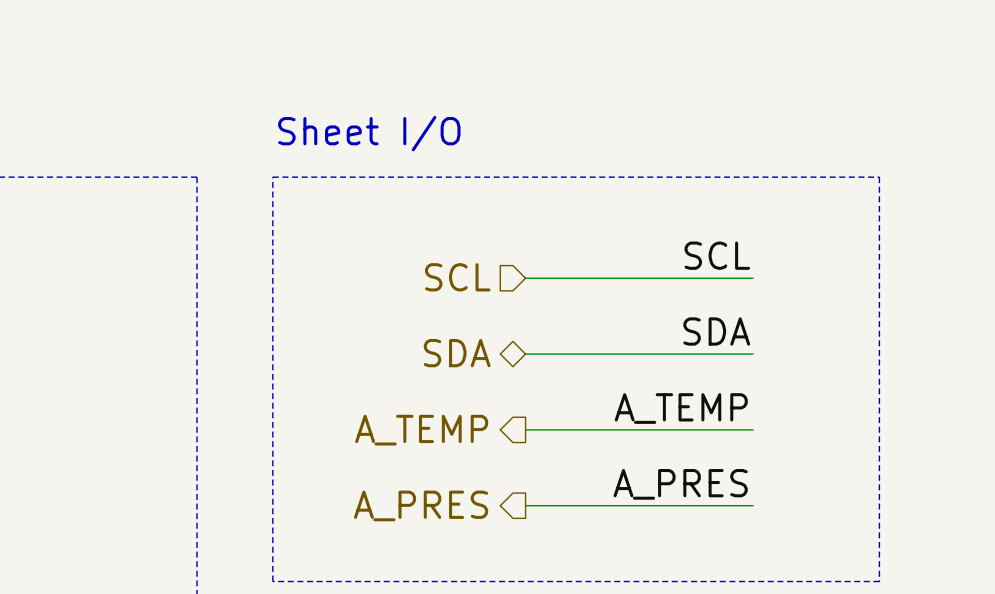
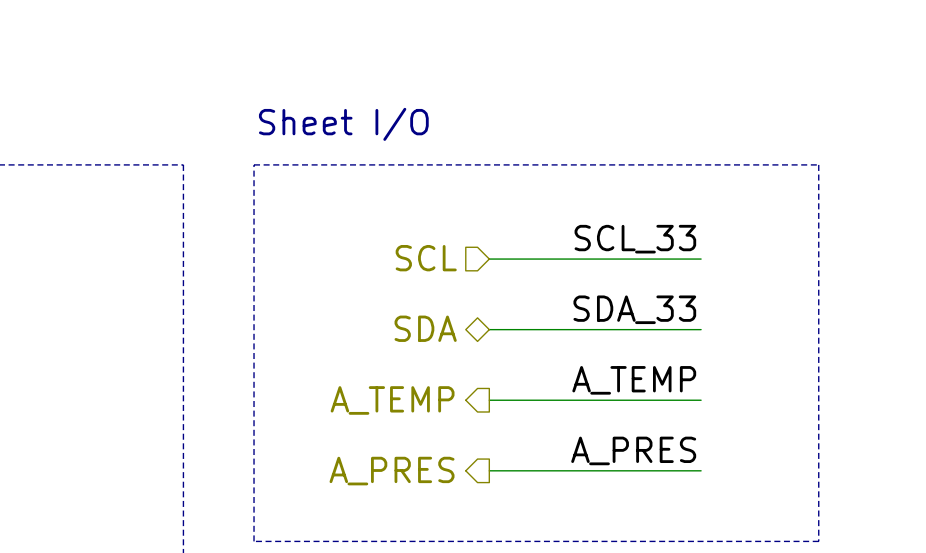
label: SCL (717, 255) -> SCL_33 (635, 239)
label: SDA (716, 331) -> SDA_33 (634, 309)

